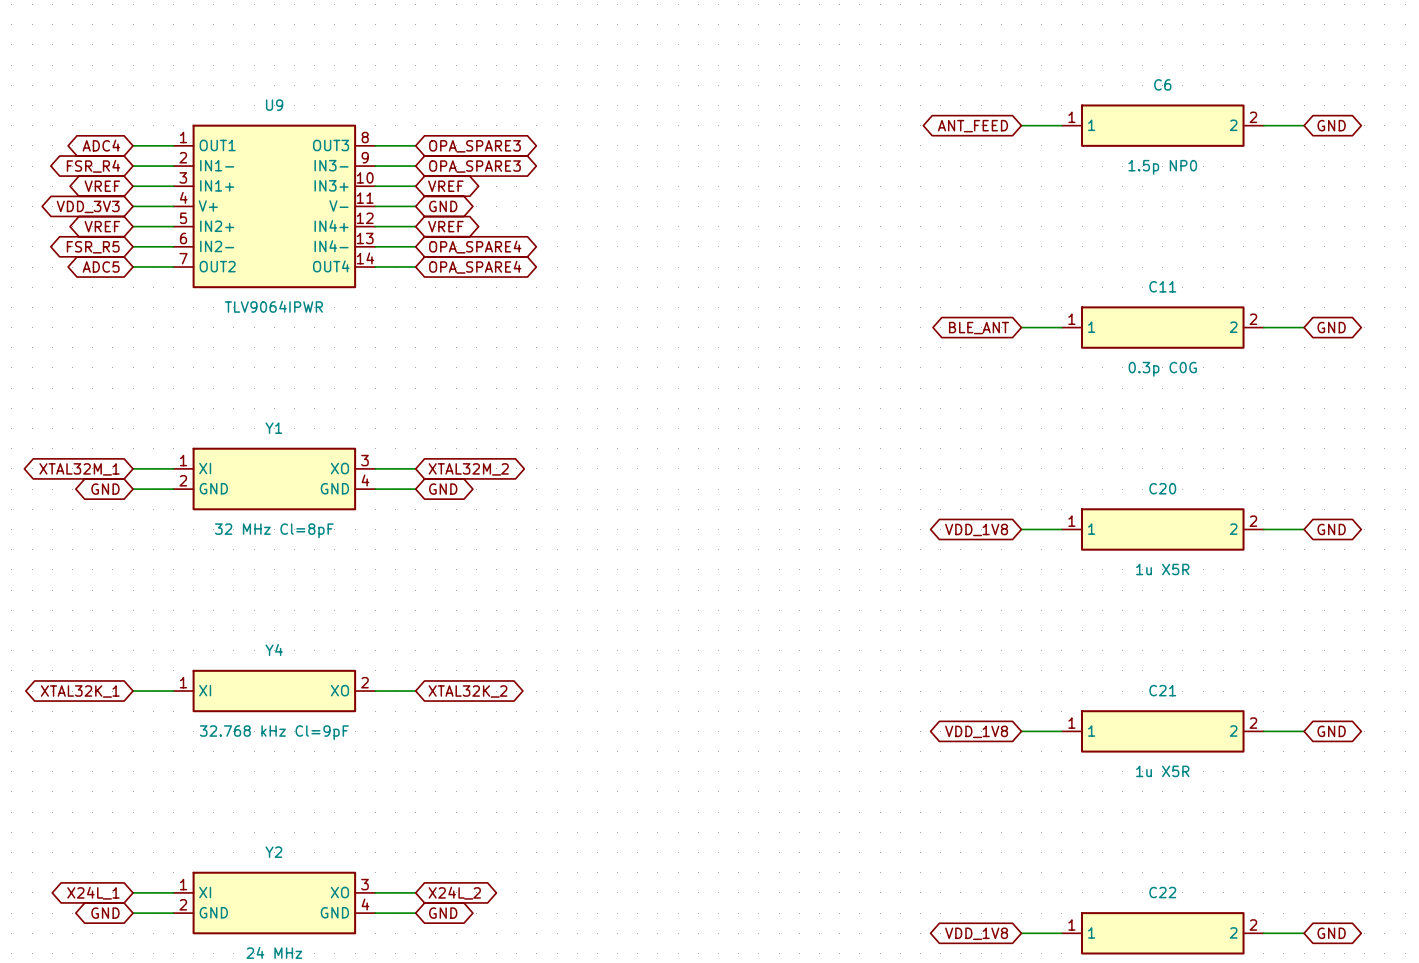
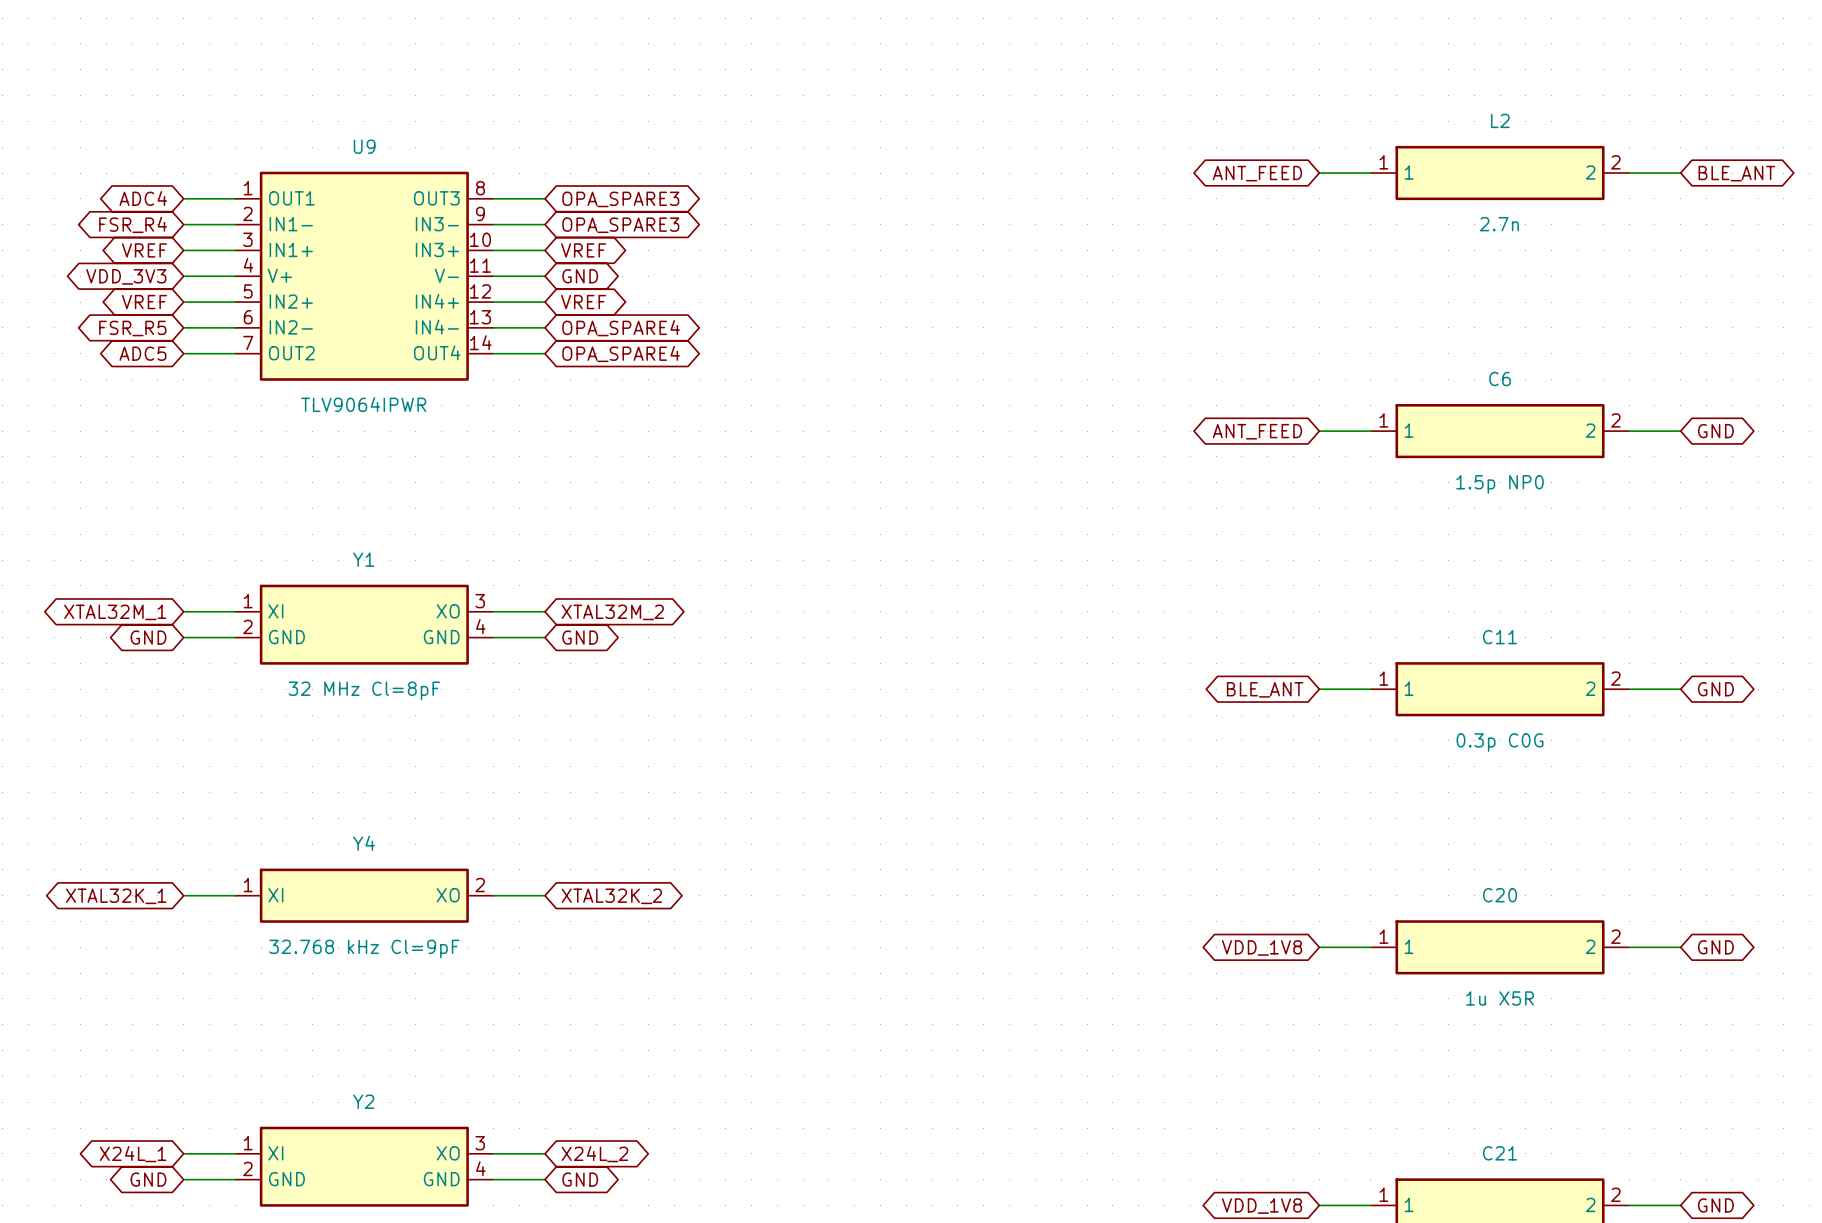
C6 name: C6 (1162, 84) -> L2 (1500, 120)
global label: GND (1331, 125) -> BLE_ANT (1736, 173)
C6 value: 1.5p NP0 (1162, 167) -> 2.7n (1499, 224)
C11 name: C11 (1162, 286) -> C6 (1500, 379)
global label: BLE_ANT (978, 328) -> ANT_FEED (1257, 431)
C11 value: 0.3p C0G (1162, 369) -> 1.5p NP0 (1500, 484)
C20 name: C20 (1162, 488) -> C11 (1500, 637)
global label: VDD_1V8 (976, 529) -> BLE_ANT (1265, 689)
C20 value: 1u X5R (1162, 569) -> 0.3p C0G (1500, 742)
C21 name: C21 (1162, 690) -> C20 (1500, 895)
C22 name: C22 (1162, 892) -> C21 (1500, 1153)

